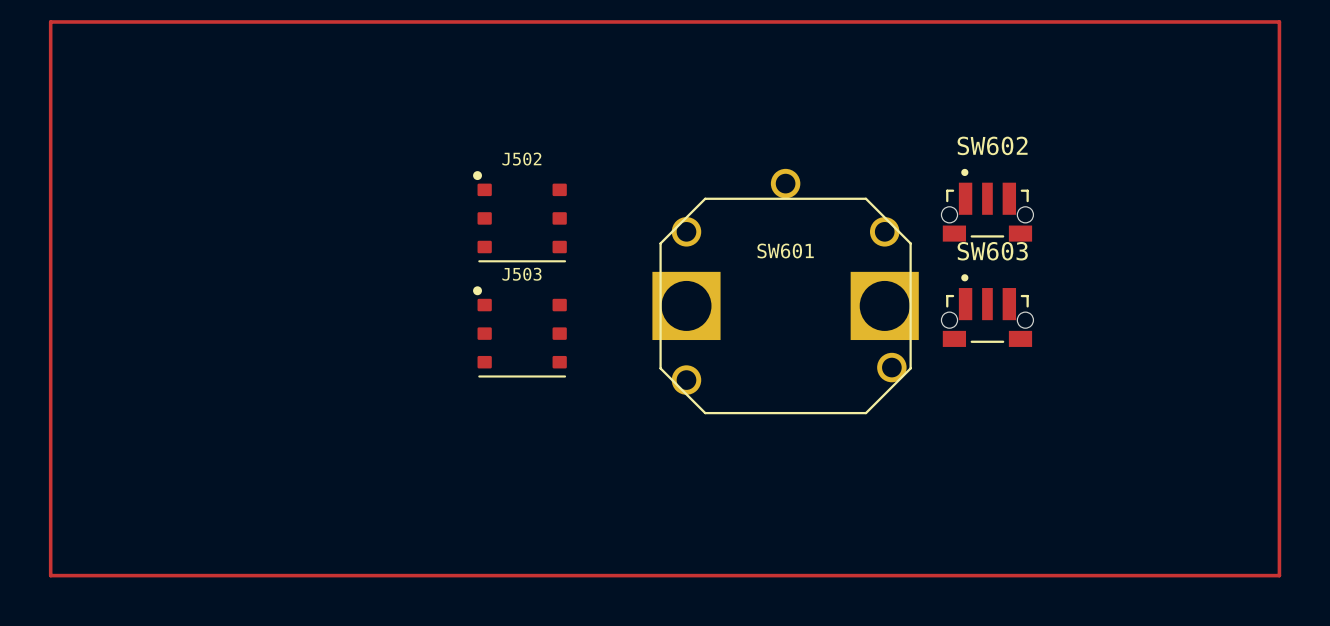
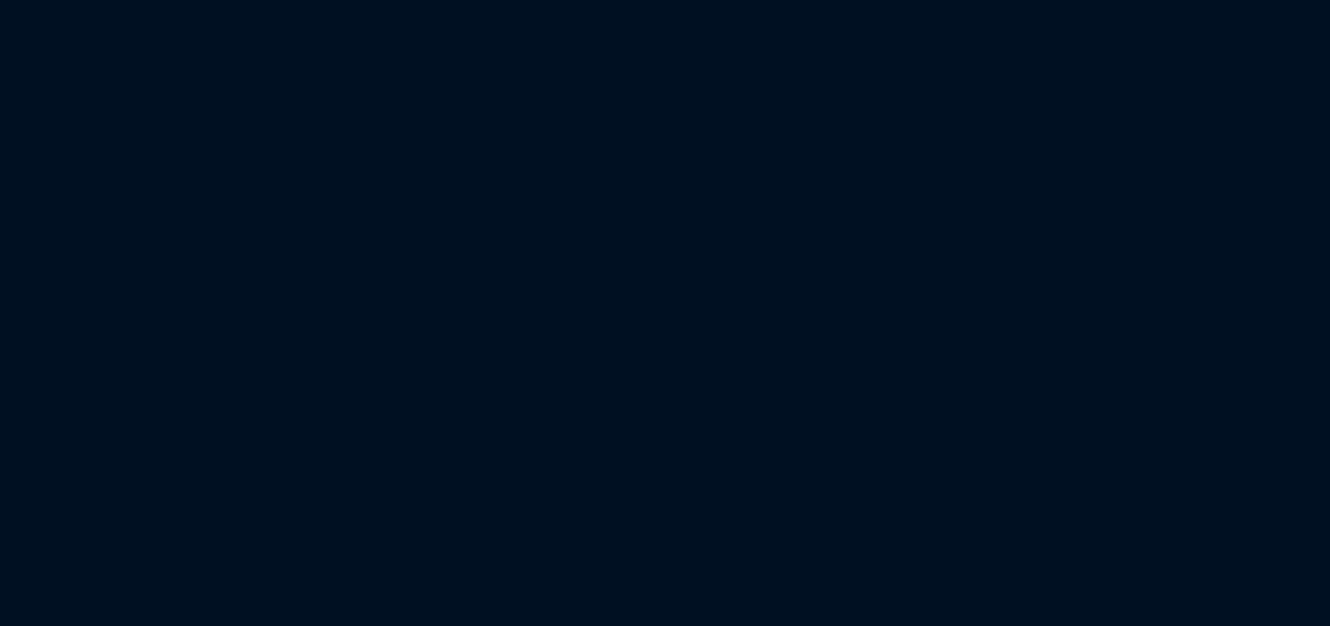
top track: (50, 21) (1279, 21) (1279, 575) (50, 575) (50, 21) -> none
SW602: (987, 205) -> none
J502: (519, 216) -> none
SW601: (785, 291) -> none
SW603: (987, 310) -> none
J503: (519, 331) -> none

